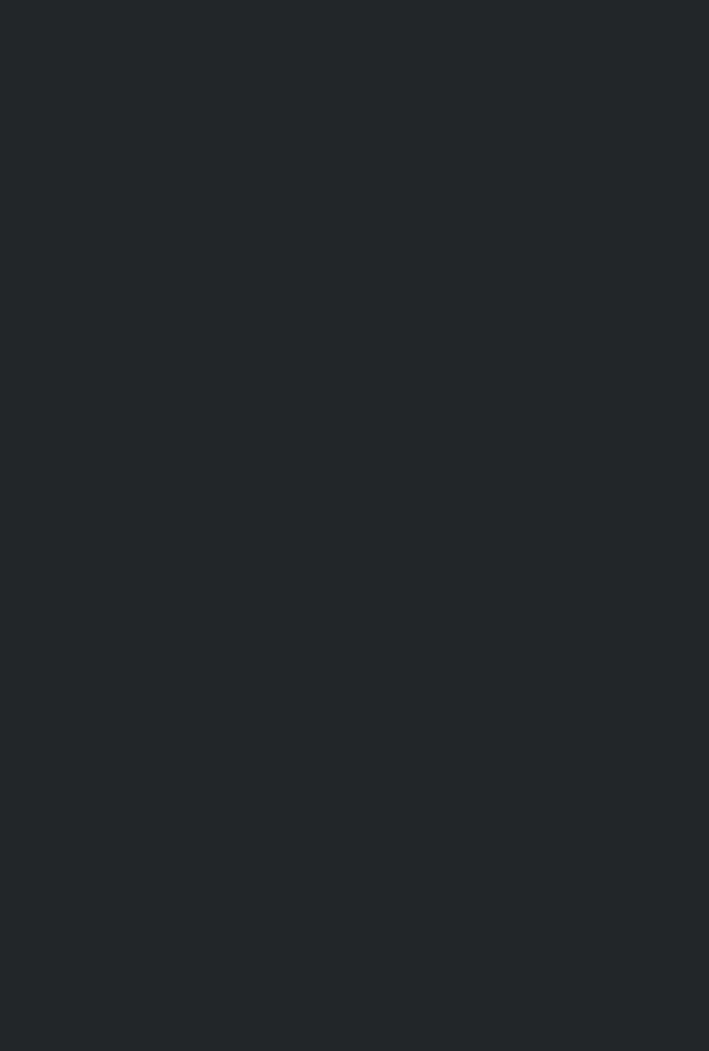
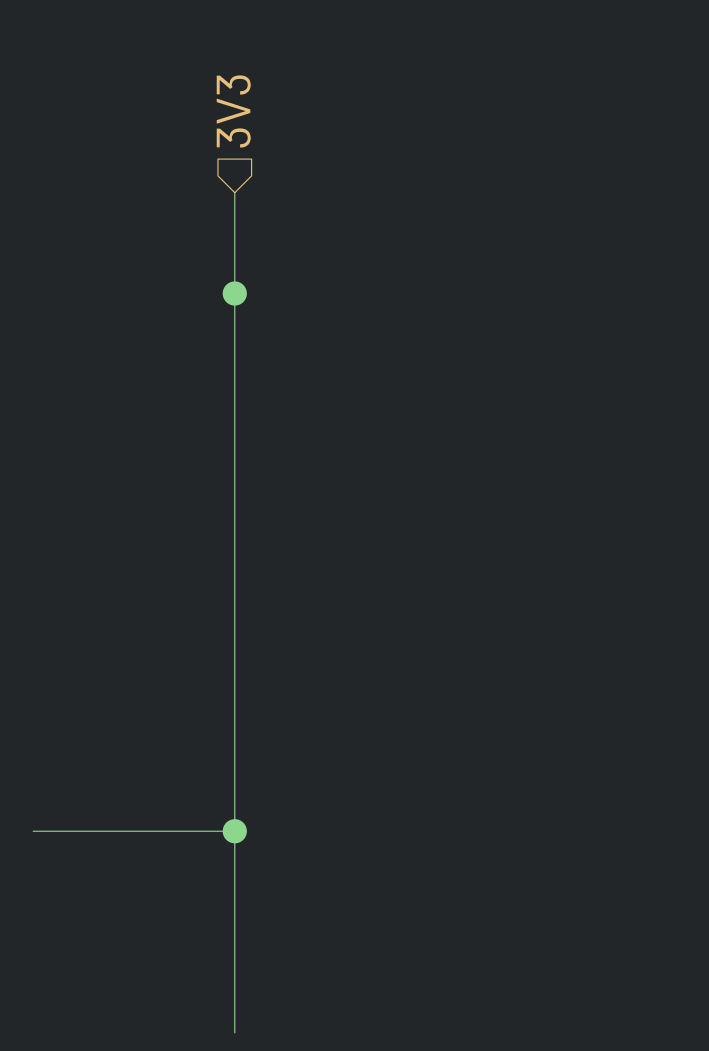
hierarchical label: none -> 3V3 (233, 111)
wire: none -> (234, 192) (234, 1032)
junction: none -> (234, 293)
wire: none -> (33, 831) (234, 831)
junction: none -> (234, 831)

